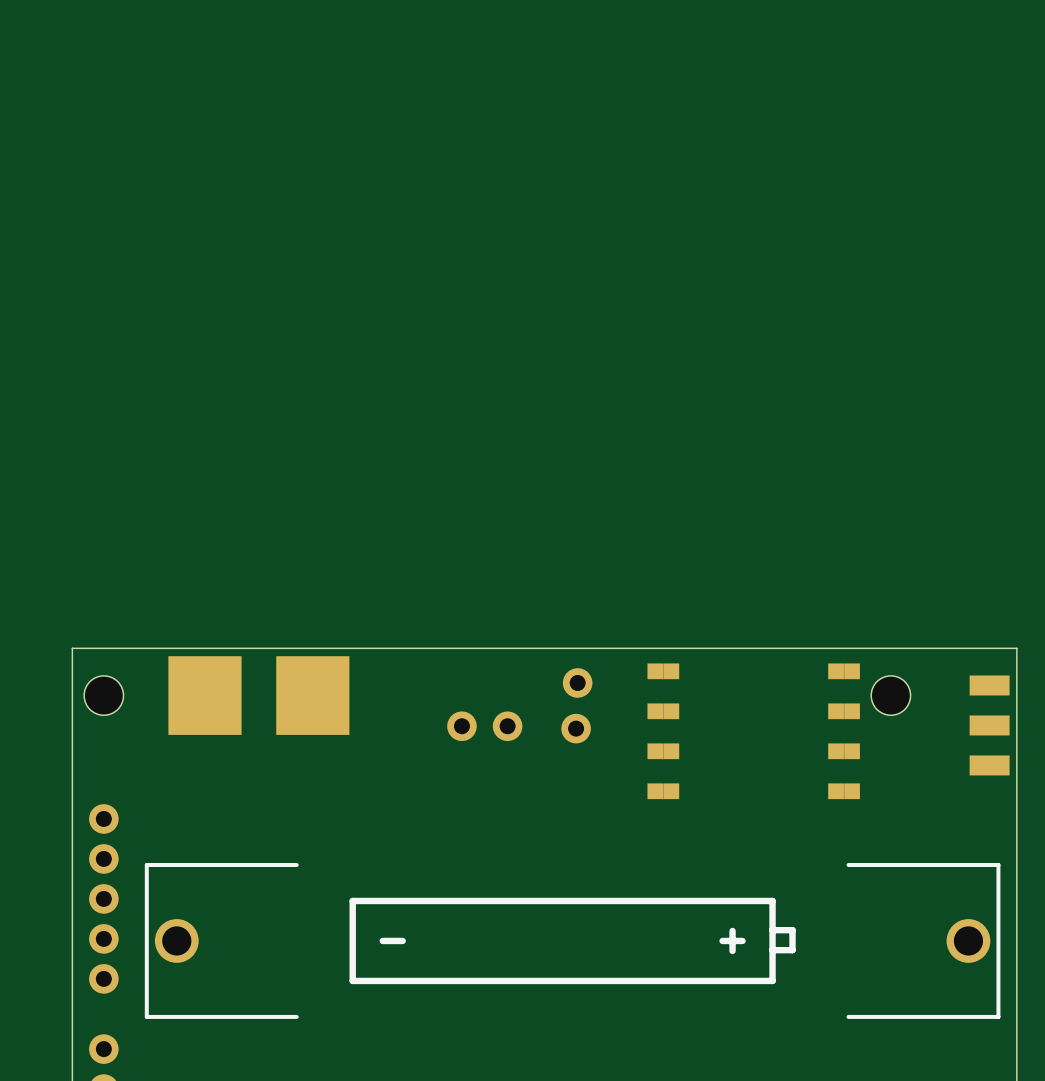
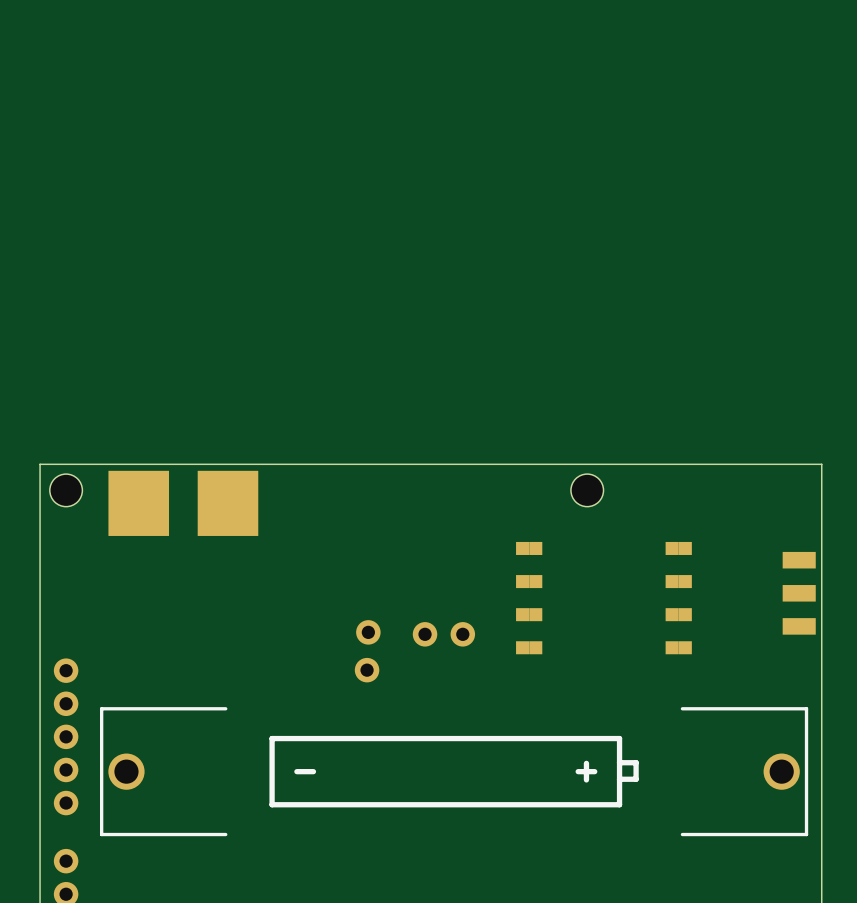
board edge: (1016, 648) (72, 648) -> (821, 529) (821, 464) (40, 464) (40, 529)
part: (577, 682) -> none
hole position: (103, 695) -> (66, 490)
part position: (258, 695) -> (183, 503)
hole position: (890, 695) -> (587, 490)
part: (461, 726) -> none
part: (507, 726) -> none
part: (576, 728) -> none
part: none -> (368, 632)
part: none -> (425, 634)
part: none -> (462, 634)
part: none -> (367, 670)

